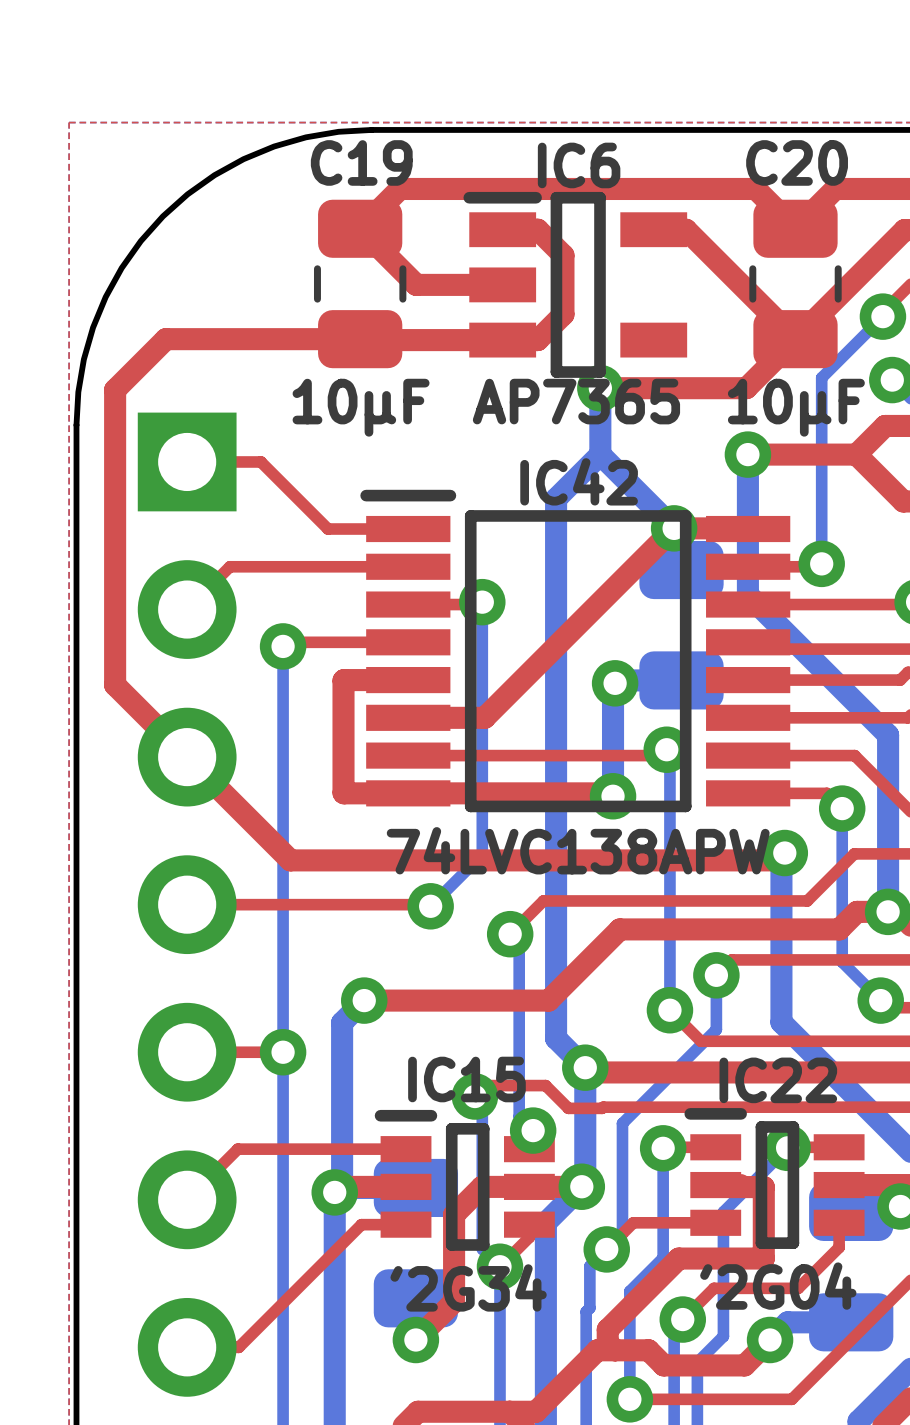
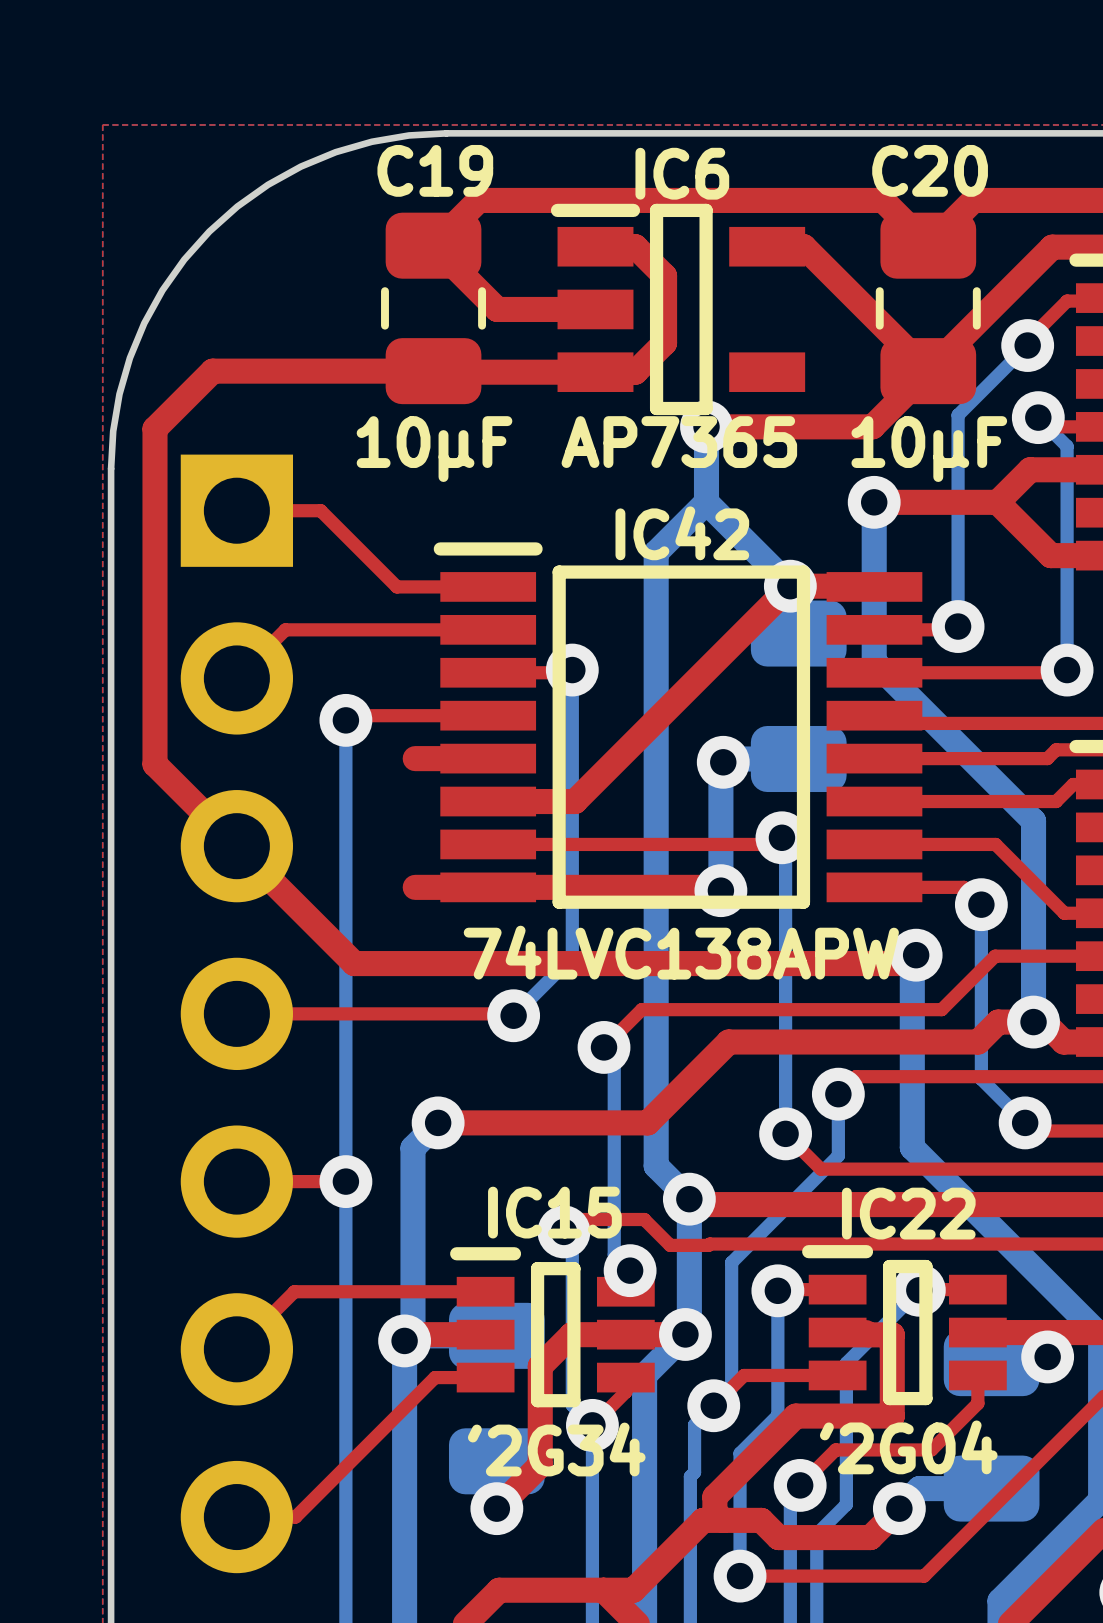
top track: (343, 680) (343, 792) -> none

